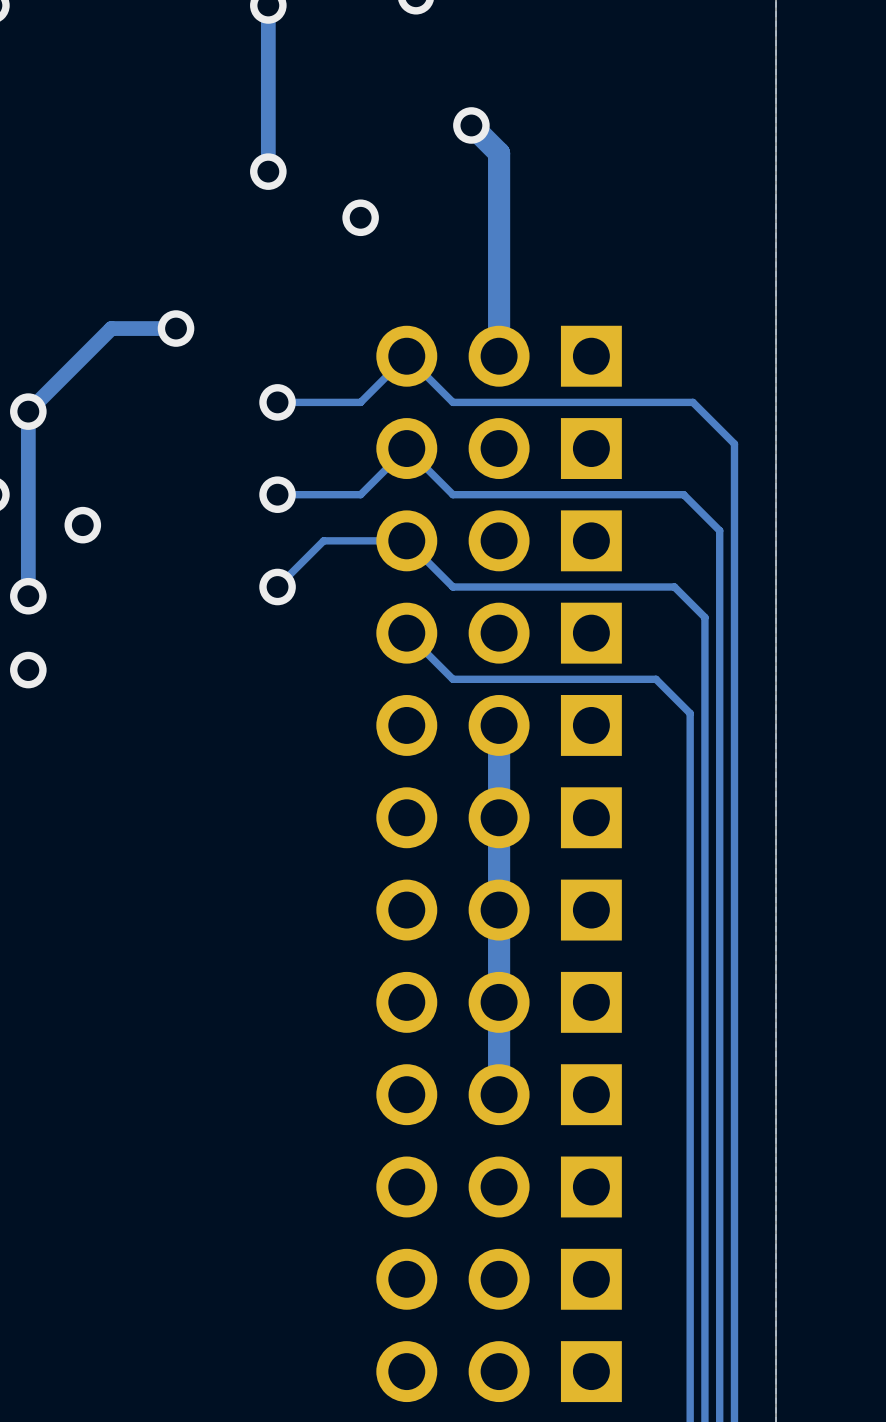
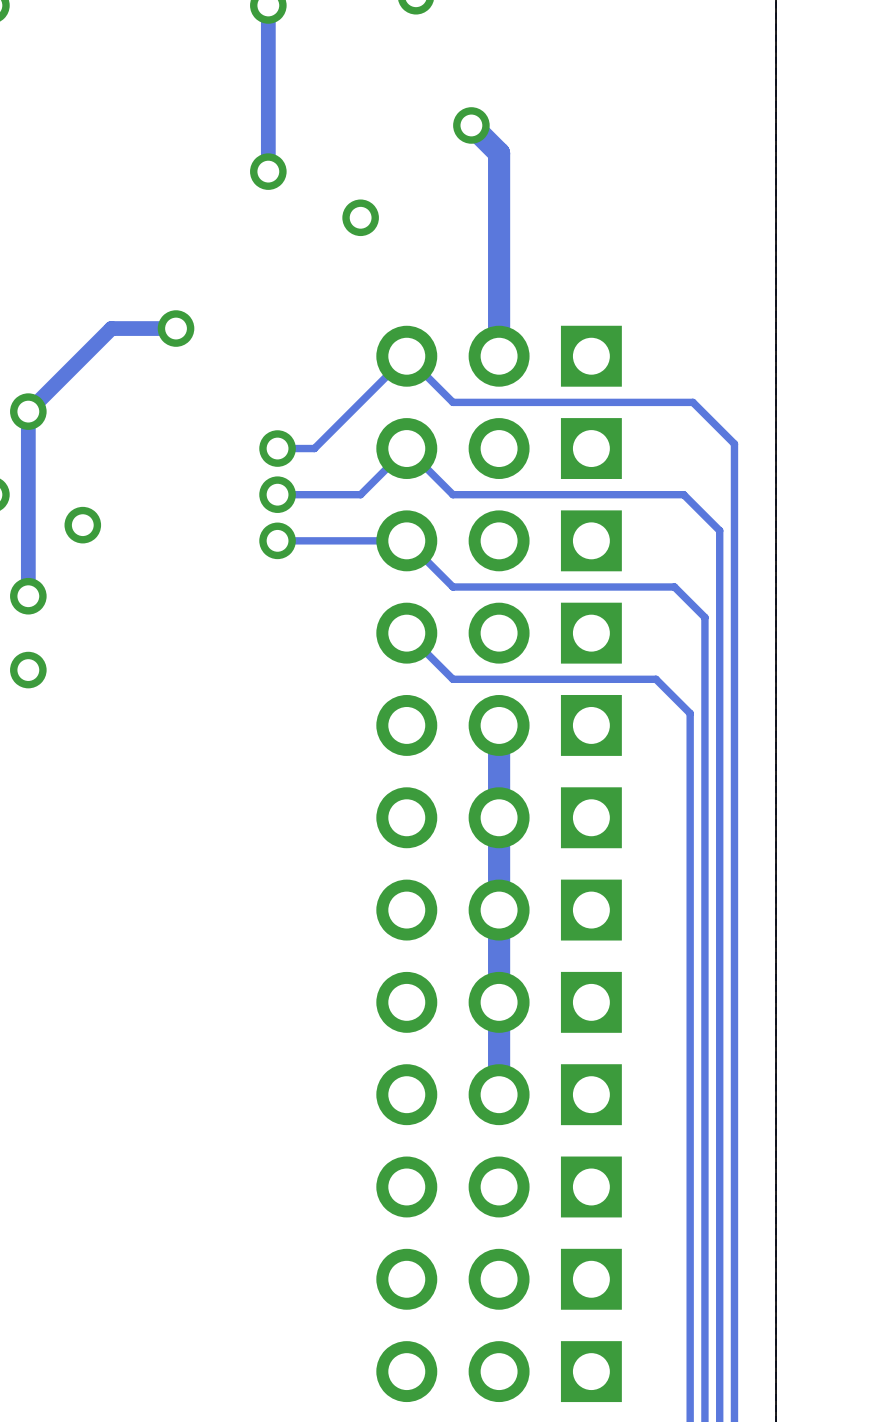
via position: (277, 402) -> (277, 448)
track: (360, 402) (277, 402) -> (360, 402) (314, 448) (277, 448)
track: (323, 540) (277, 587) -> (323, 540) (277, 540)
via position: (277, 587) -> (277, 540)

